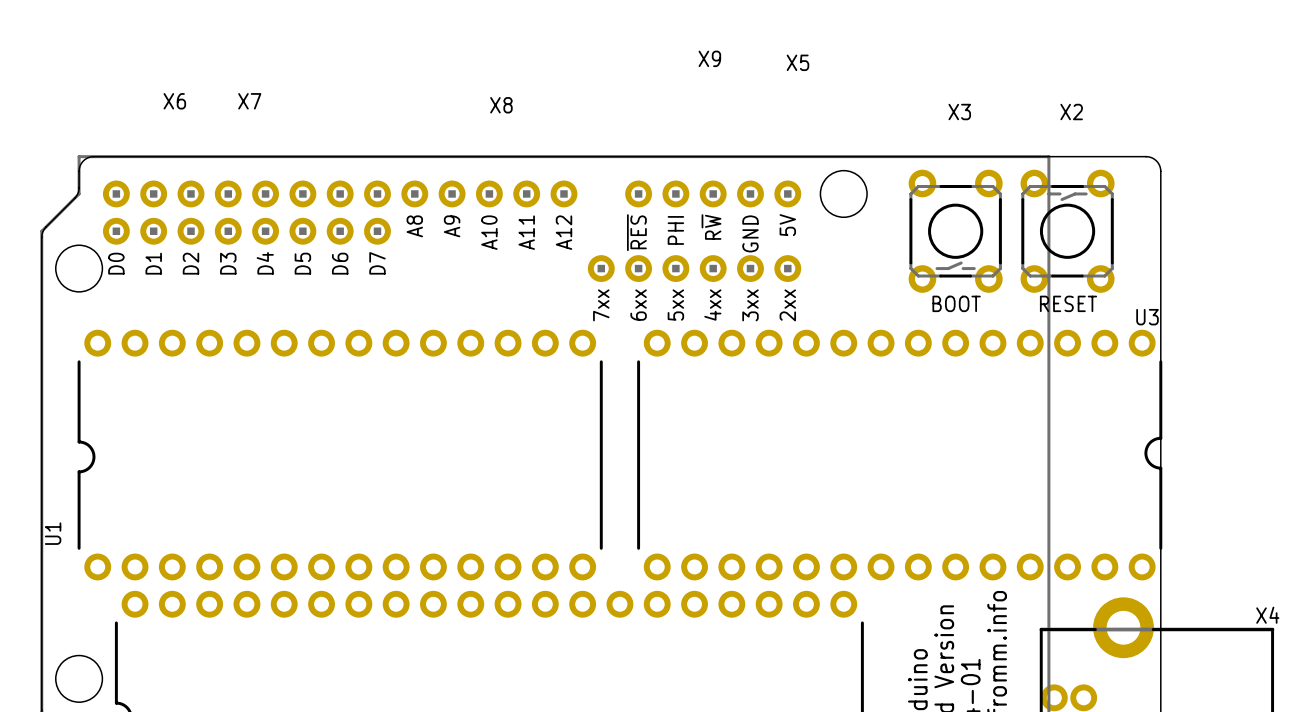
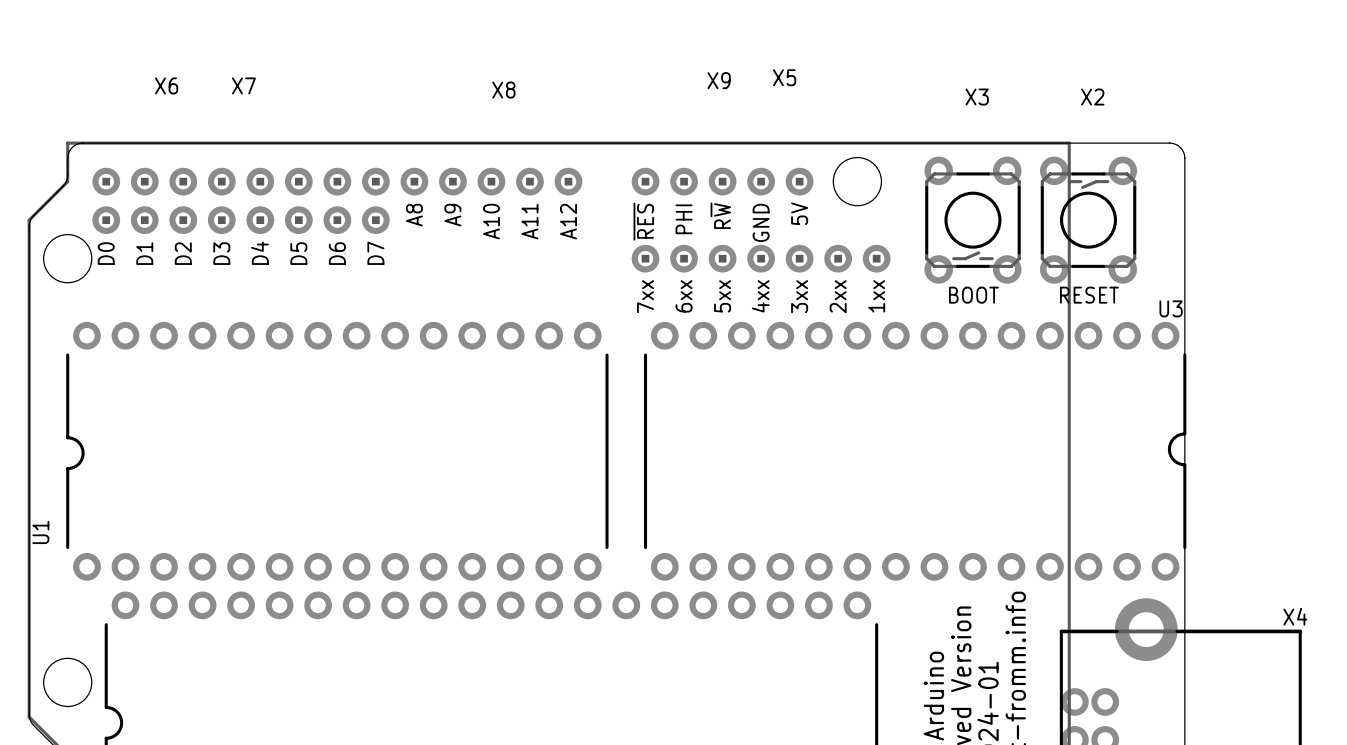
X9 name position: X9 (709, 58) -> X9 (719, 80)
X5 name position: X5 (797, 62) -> X5 (784, 77)
X5 footprint: [587, 255, 802, 282] -> [631, 244, 891, 273]
text: 7xx (601, 305) -> none
text: 6xx (638, 305) -> 7xx (645, 296)
text: 5xx (675, 305) -> 6xx (684, 296)
text: 4xx (712, 305) -> 5xx (722, 296)
text: 3xx (750, 305) -> 4xx (760, 296)
text: 2xx (787, 305) -> 3xx (799, 296)
text: none -> 2xx (838, 296)
text: none -> 1xx (876, 296)

